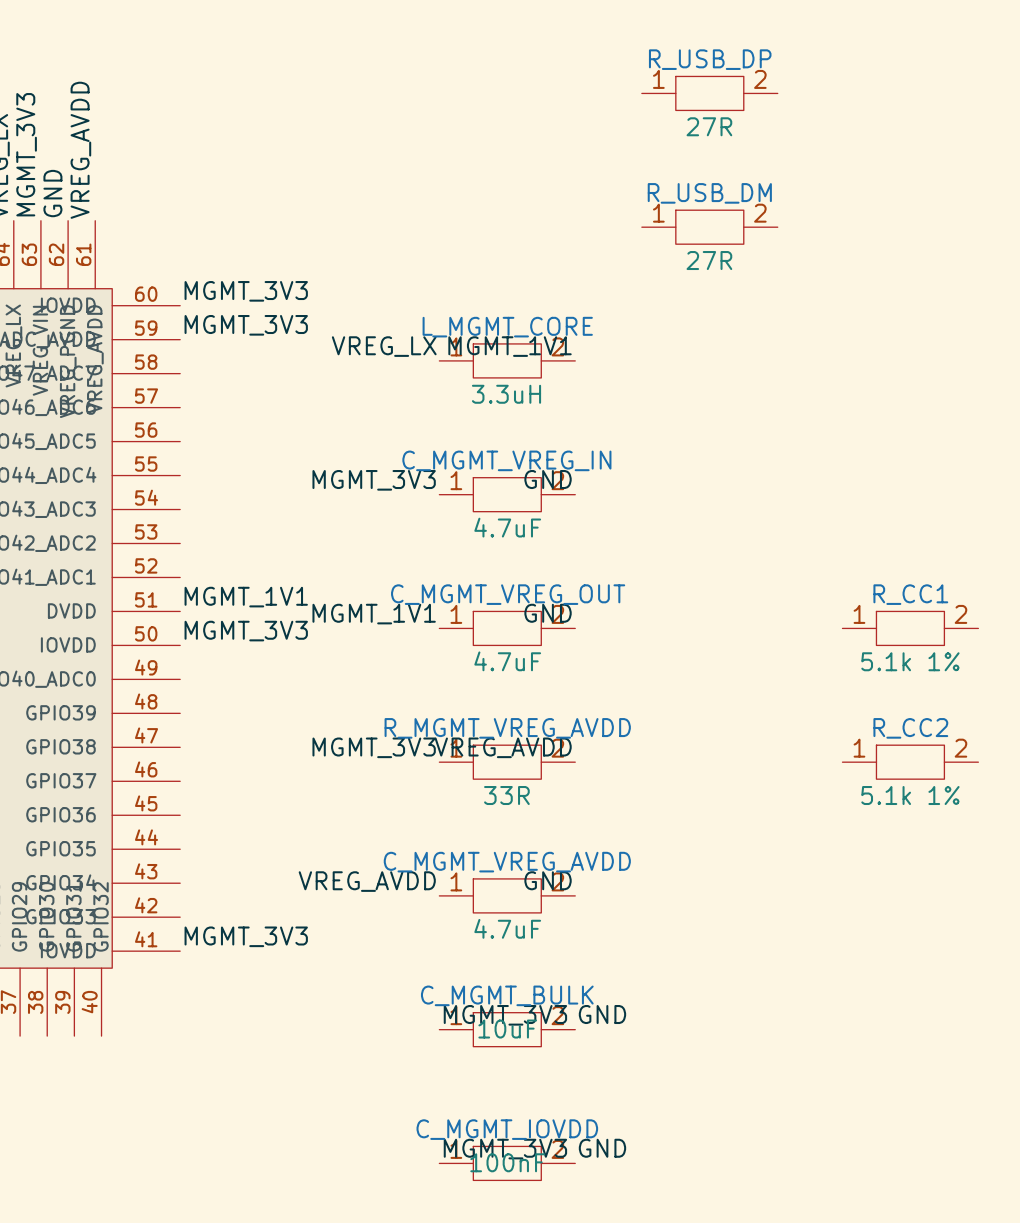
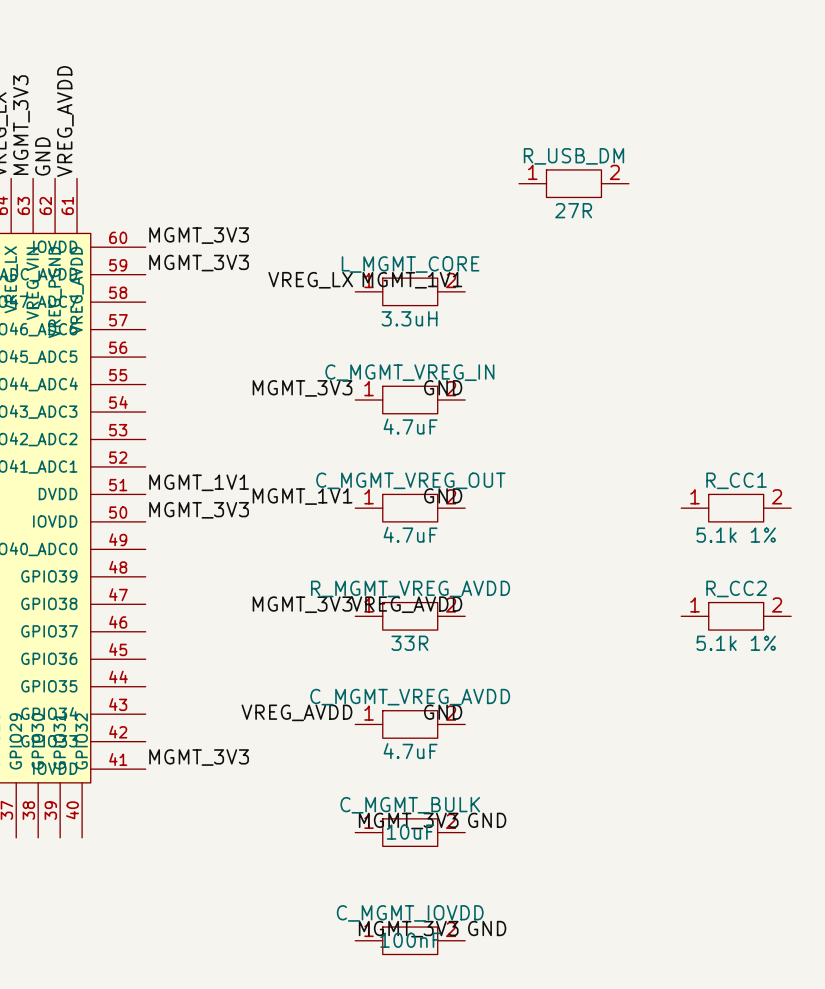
R_USB_DP: 27R (709, 93) -> none

